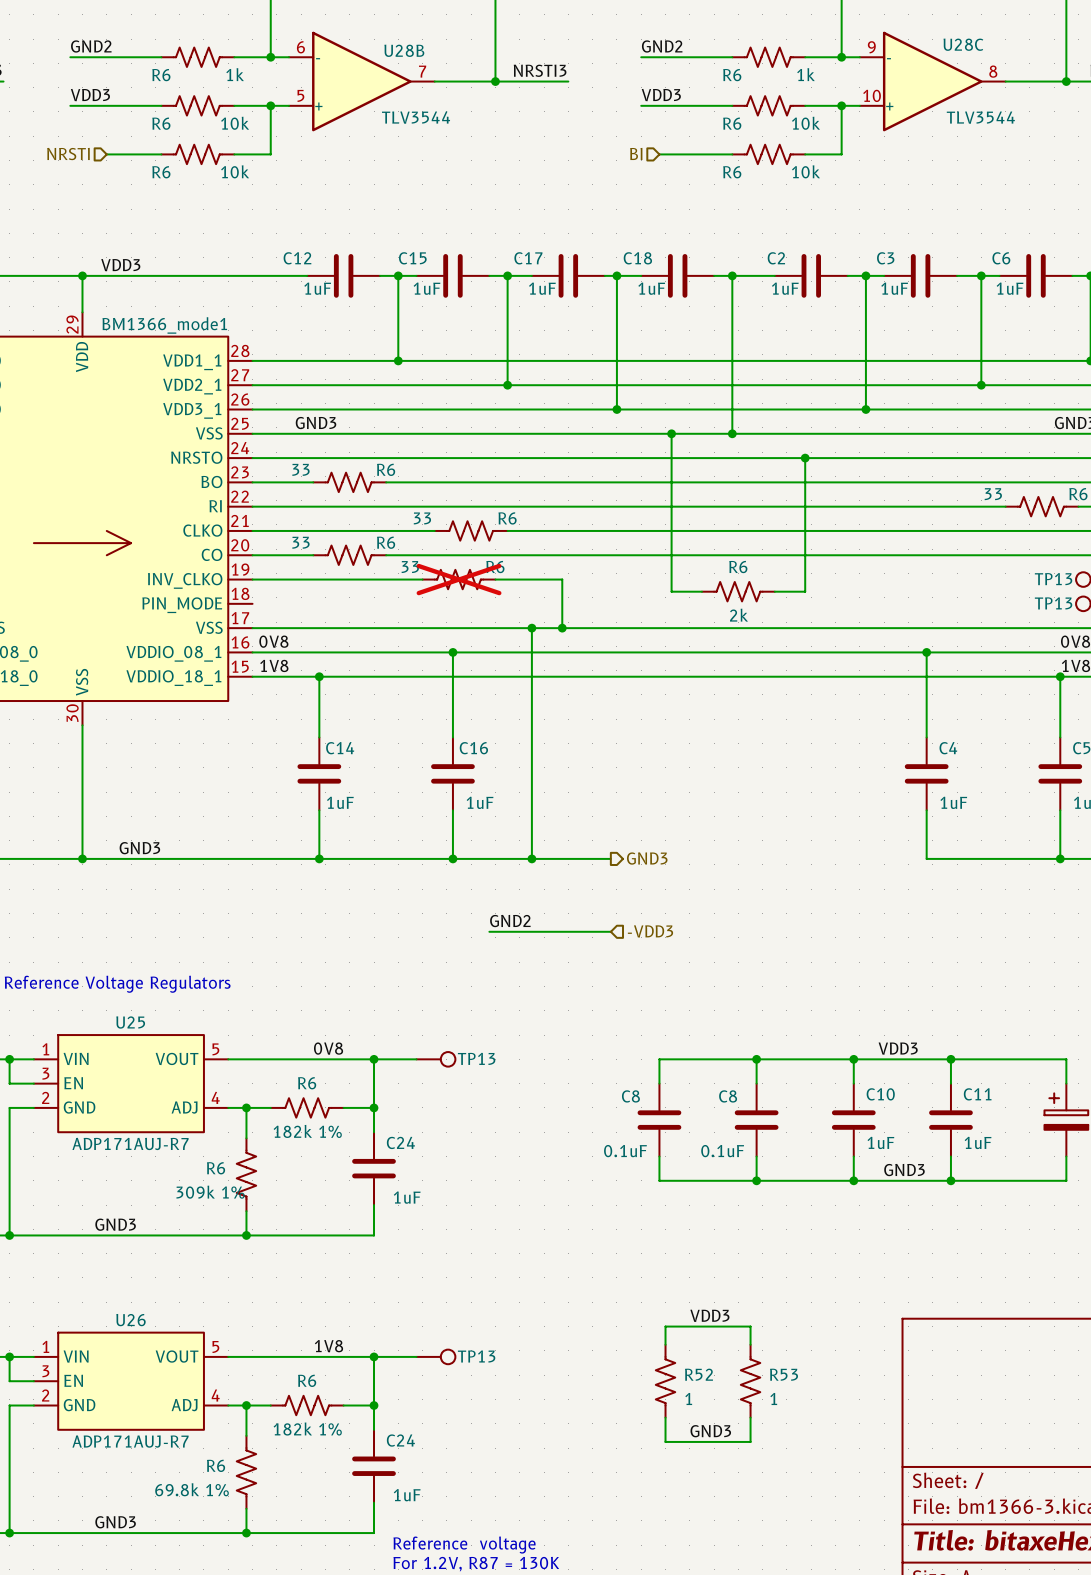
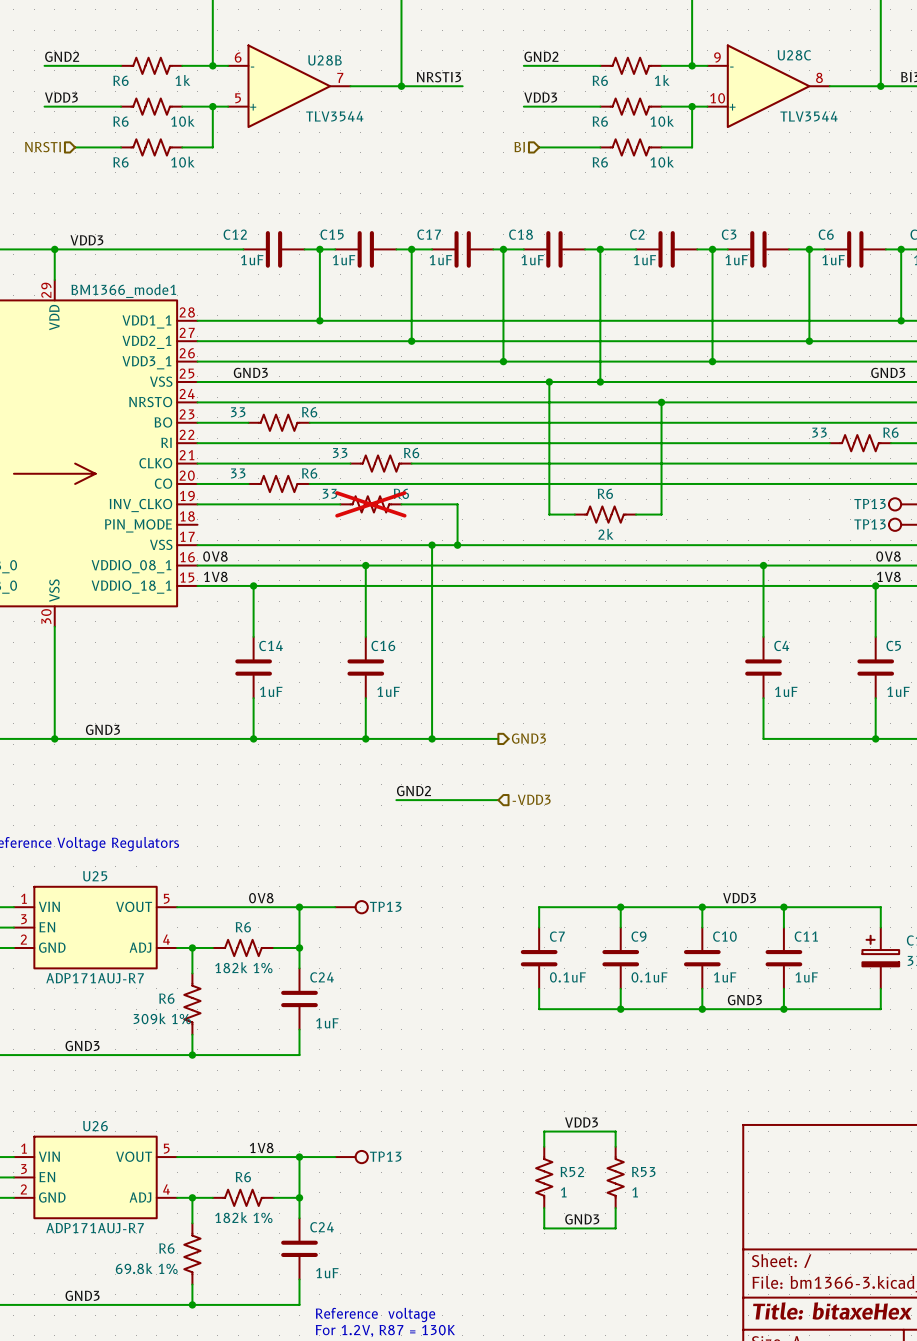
C8 name: C8 (630, 1096) -> C7 (557, 936)
C8 name: C8 (728, 1096) -> C9 (639, 936)
C8 value position: 0.1uF (625, 1151) -> 0.1uF (567, 977)
C8 value position: 0.1uF (722, 1151) -> 0.1uF (649, 977)

